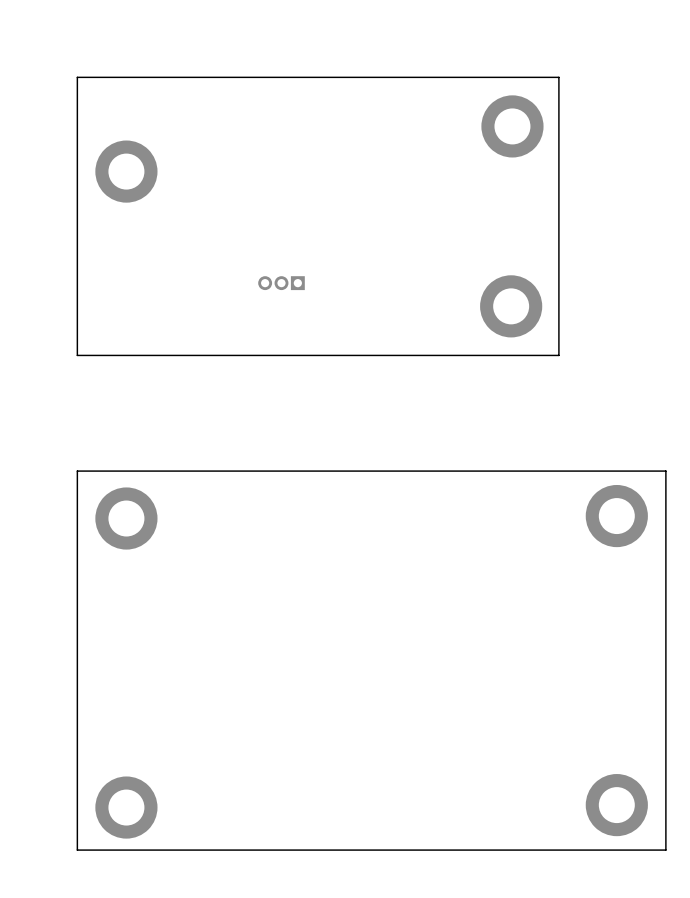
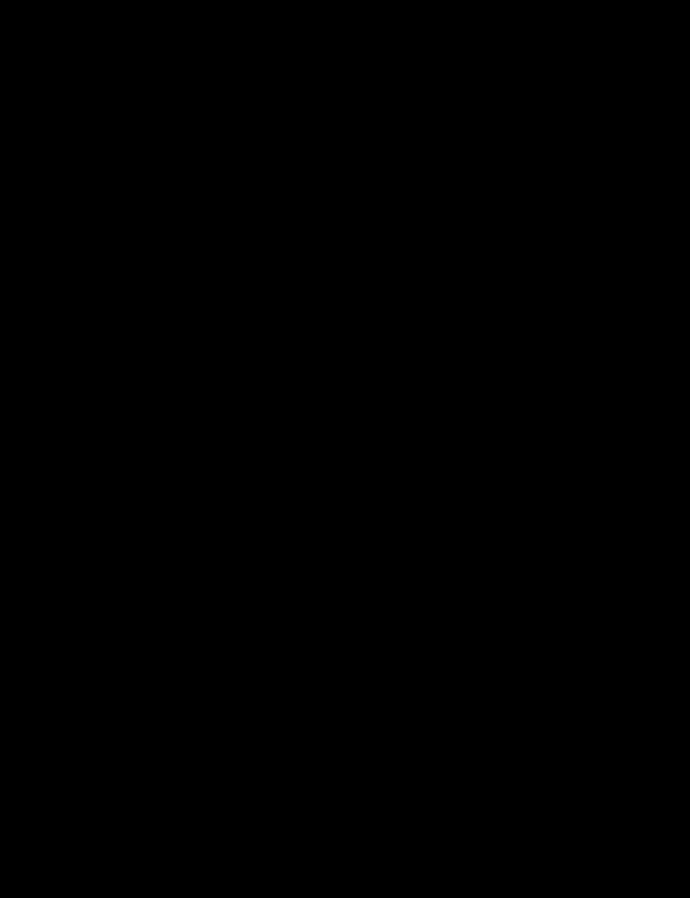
board edge: (558, 77) (77, 77) (77, 355) (558, 355) (558, 77) -> none
part: (512, 126) -> none
part: (126, 171) -> none
part: (281, 283) -> none
part: (511, 306) -> none
board edge: (665, 471) (77, 471) (77, 850) (665, 850) (665, 471) -> none
part: (616, 516) -> none
part: (126, 518) -> none
part: (616, 805) -> none
part: (126, 807) -> none

